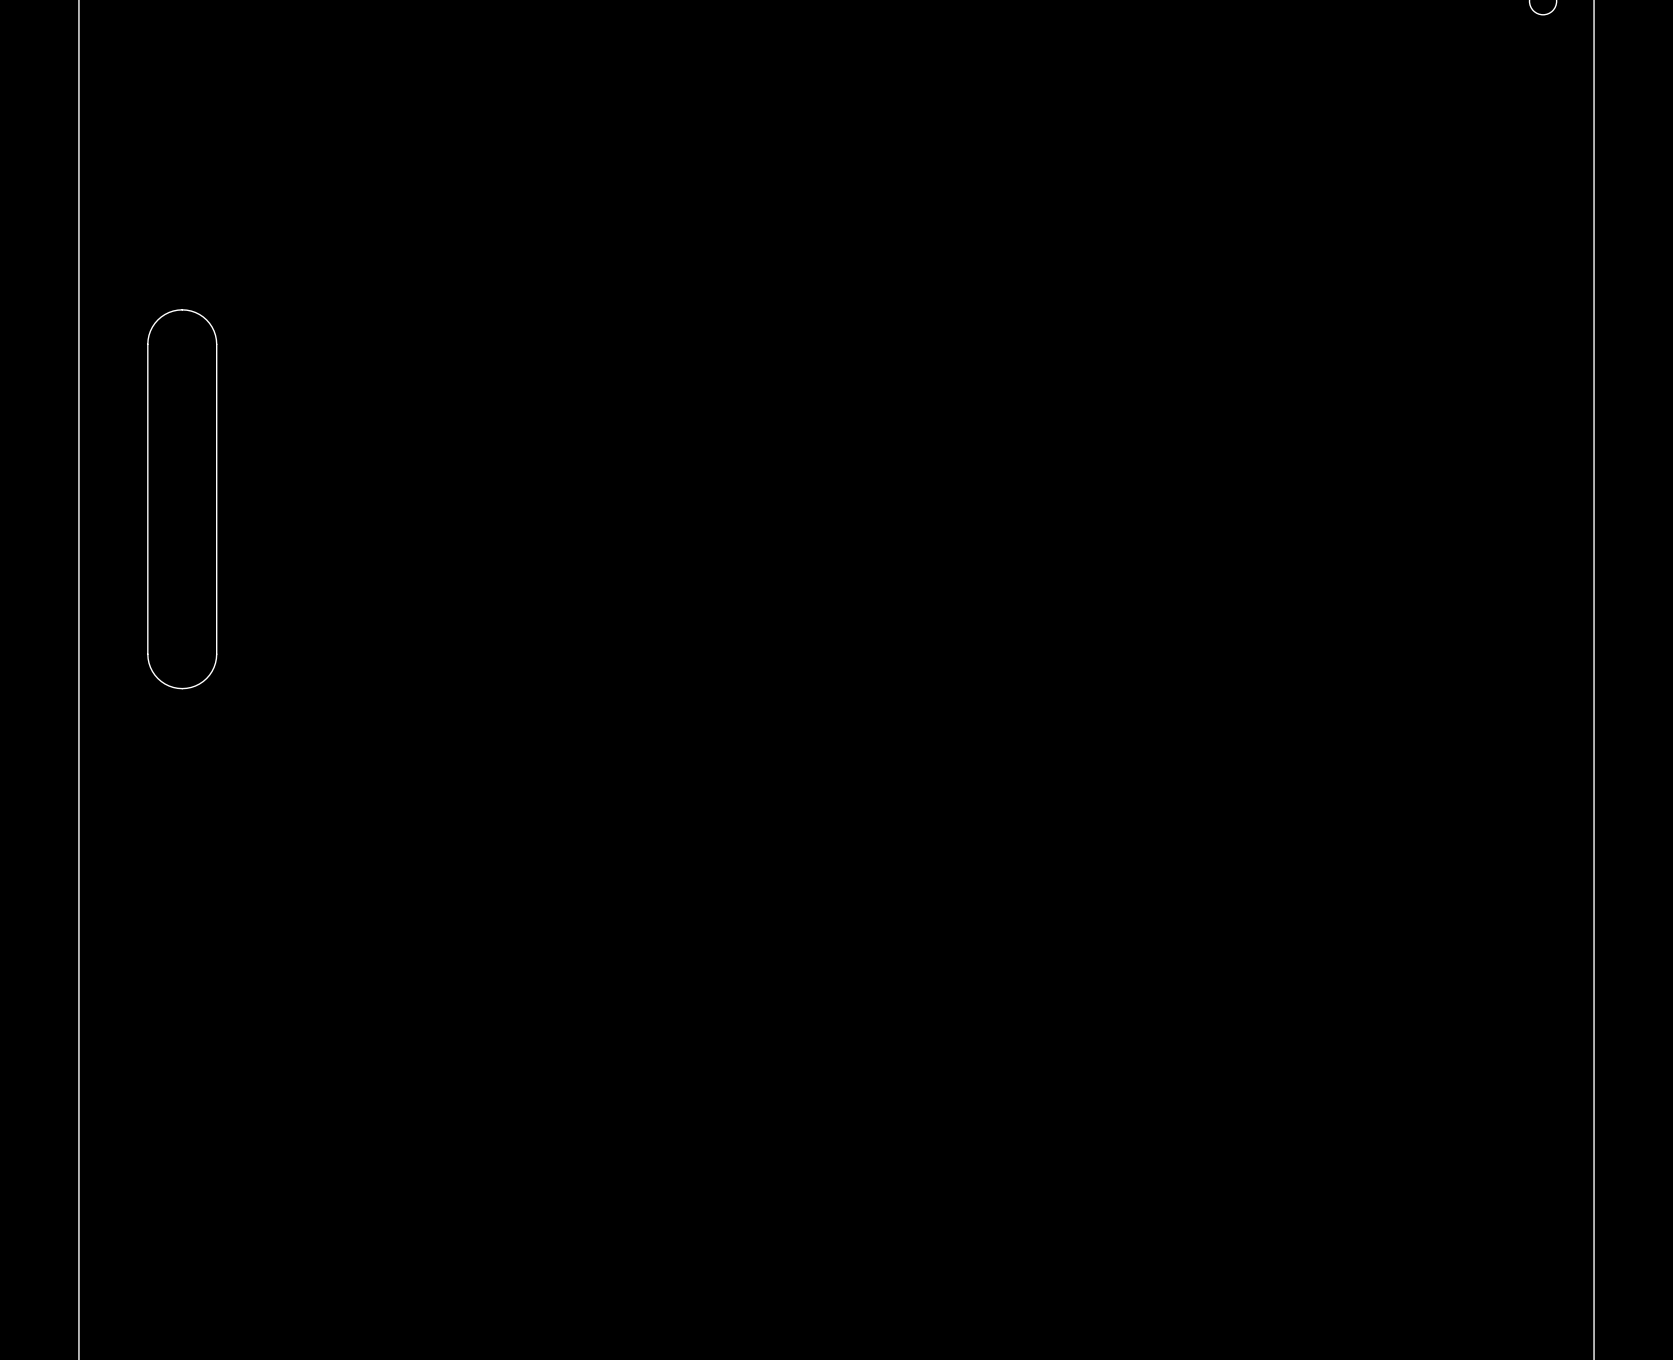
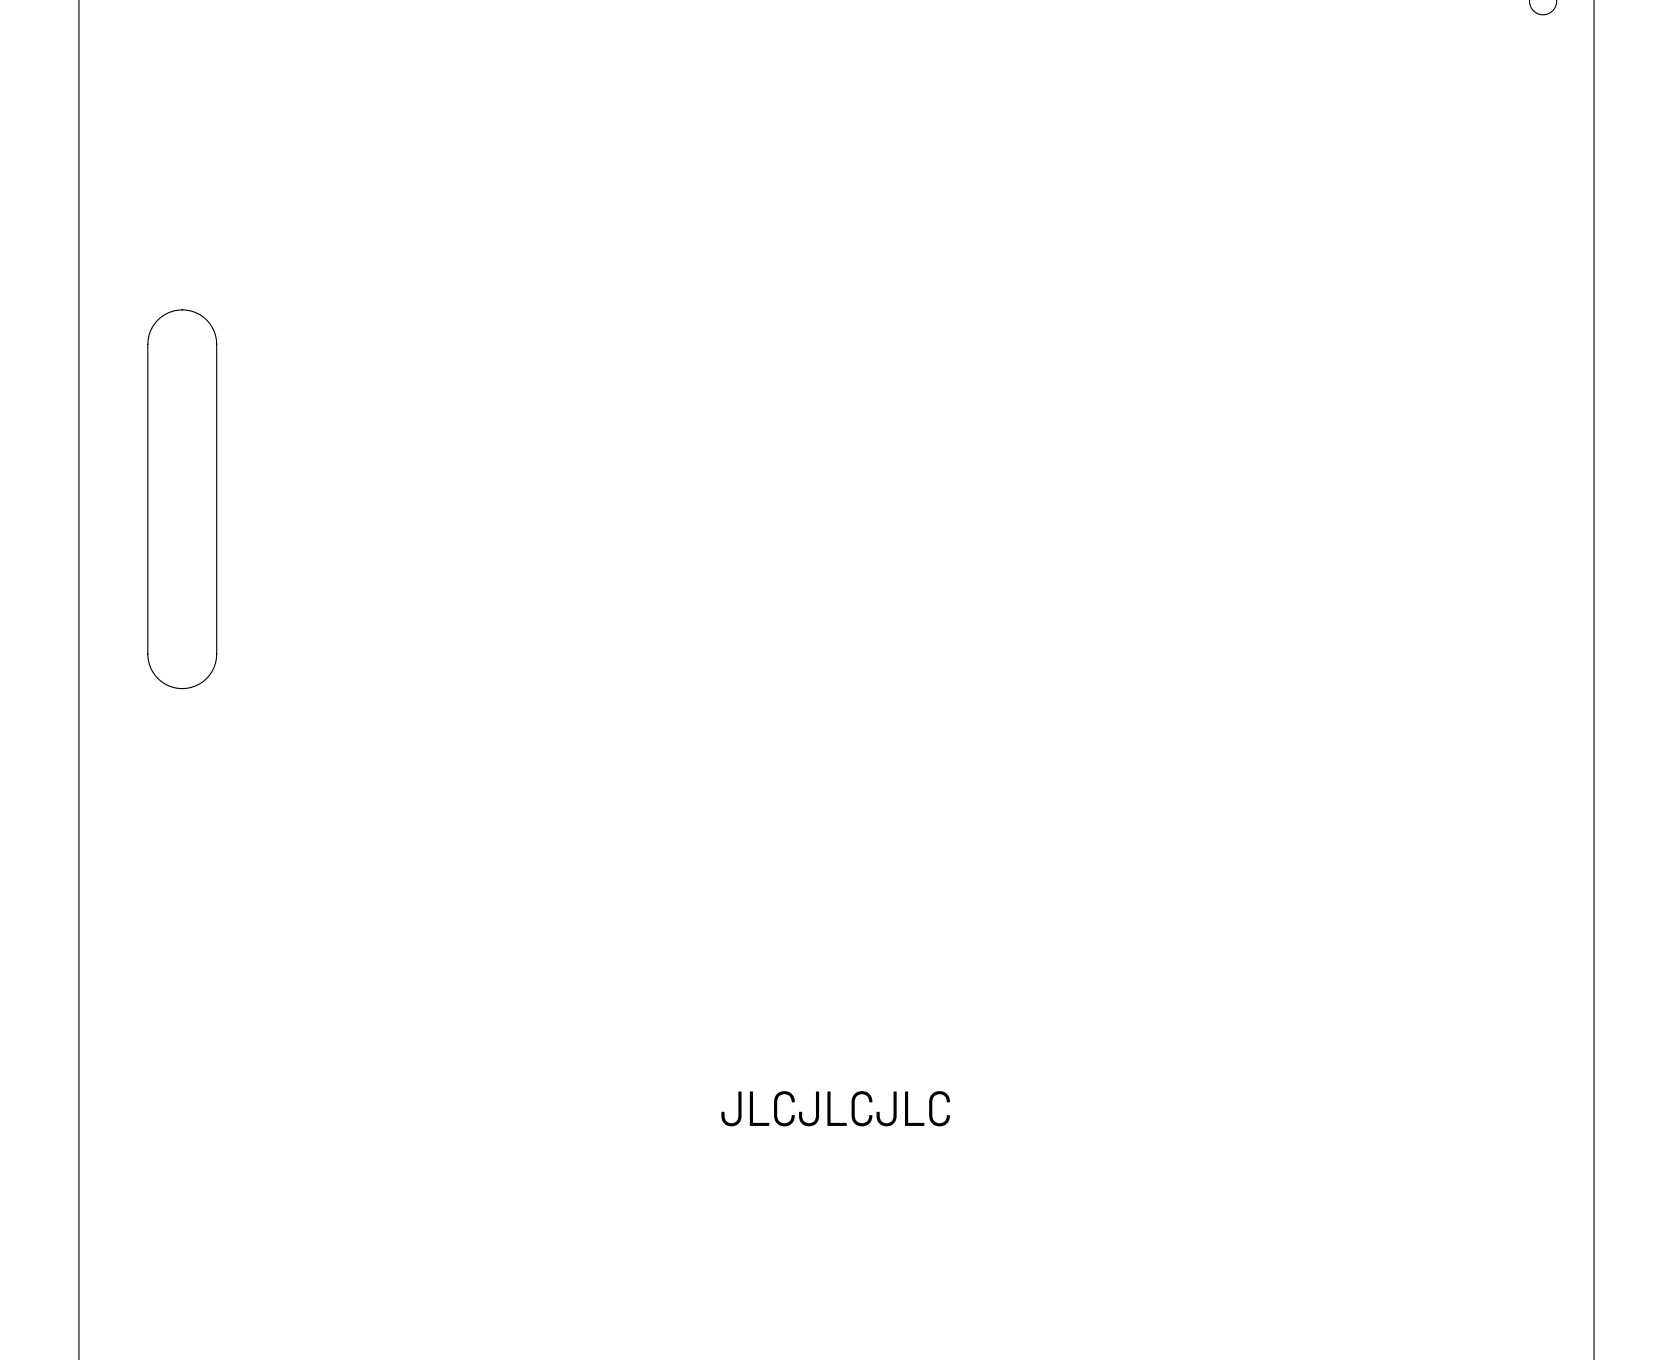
text: none -> JLCJLCJLC (835, 1108)

